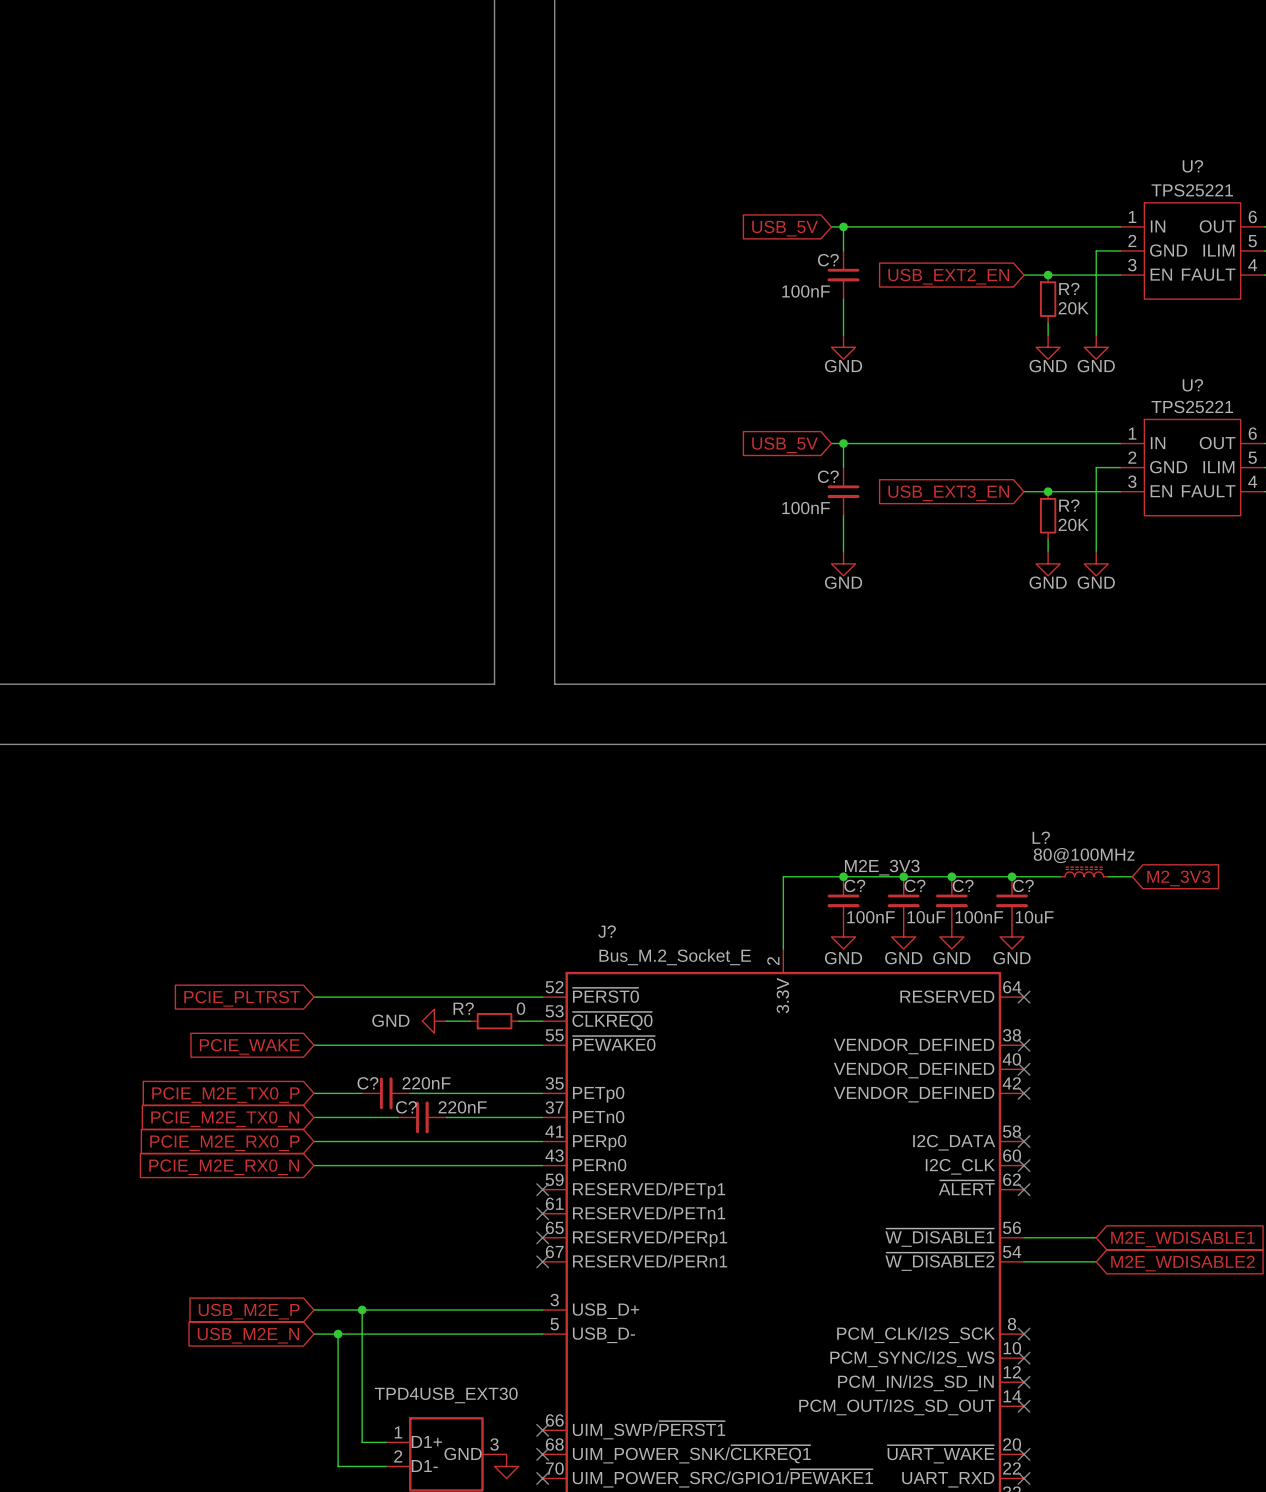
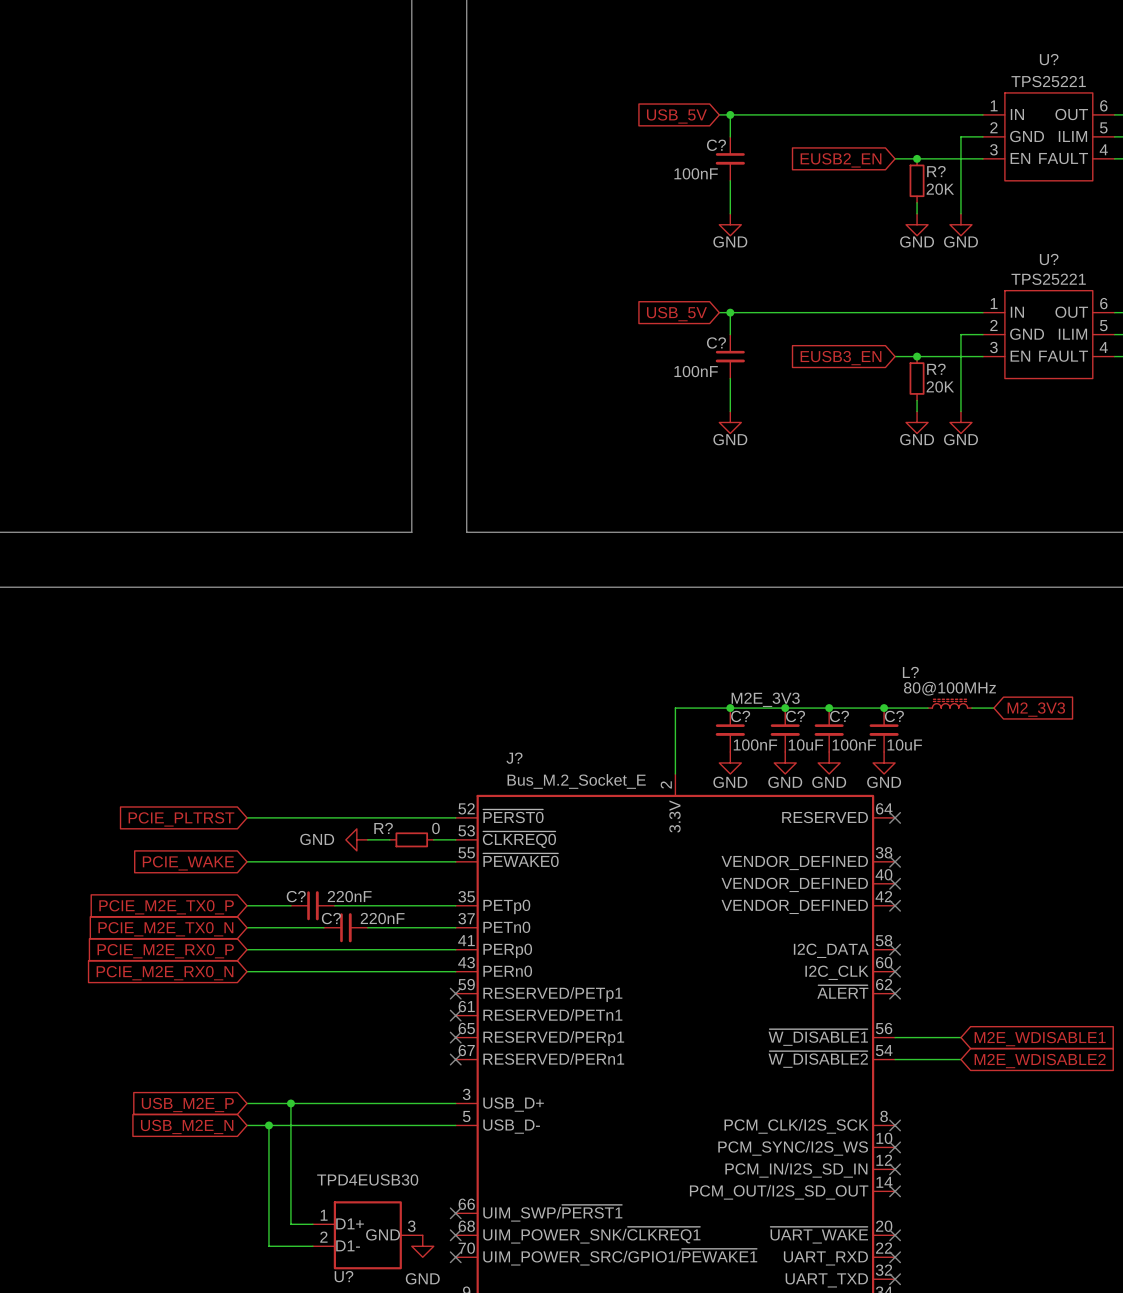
global label: USB_EXT2_EN (948, 276) -> EUSB2_EN (841, 160)
global label: USB_EXT3_EN (948, 493) -> EUSB3_EN (841, 358)
U? value: TPD4USB_EXT30 (446, 1395) -> TPD4EUSB30 (367, 1179)

